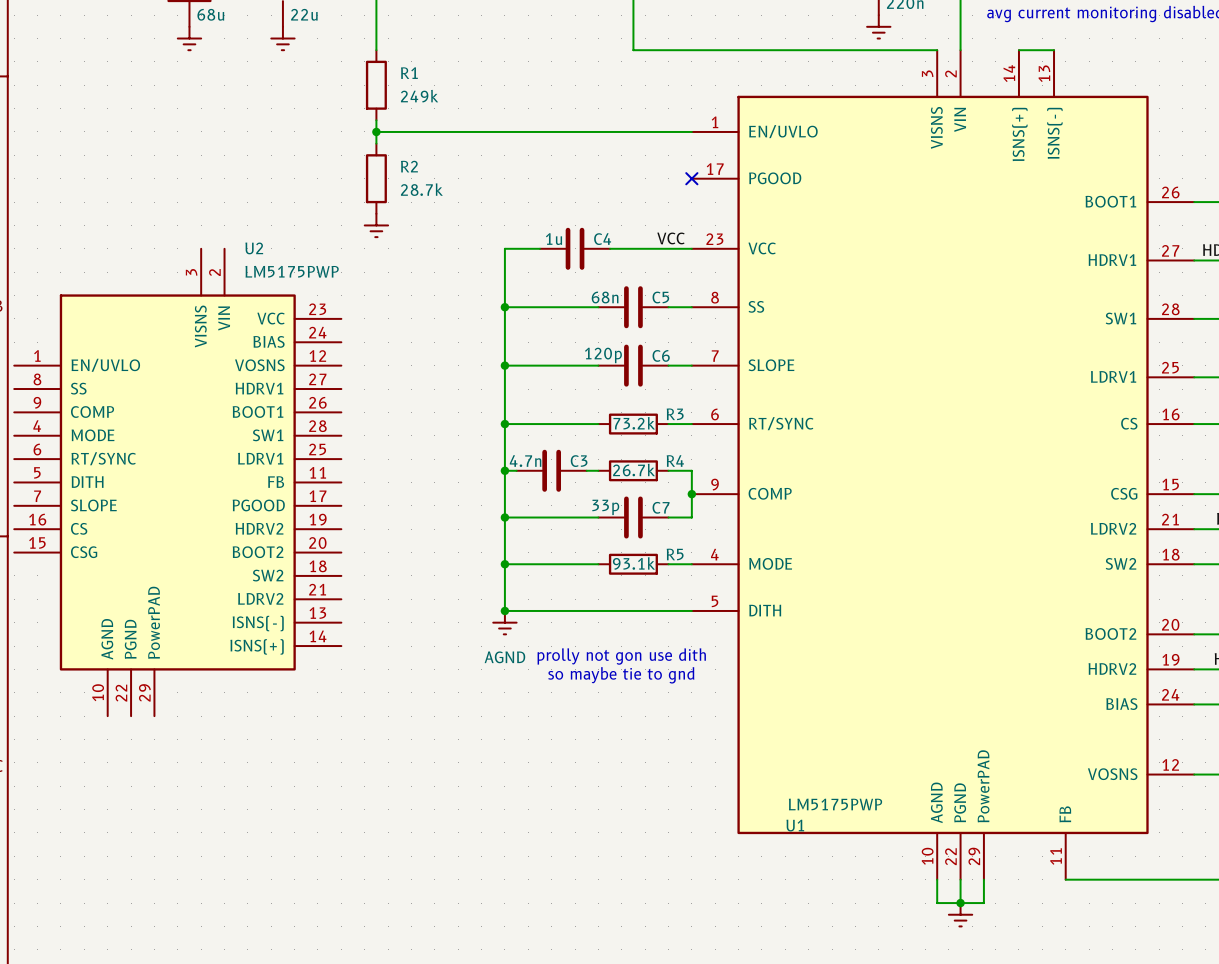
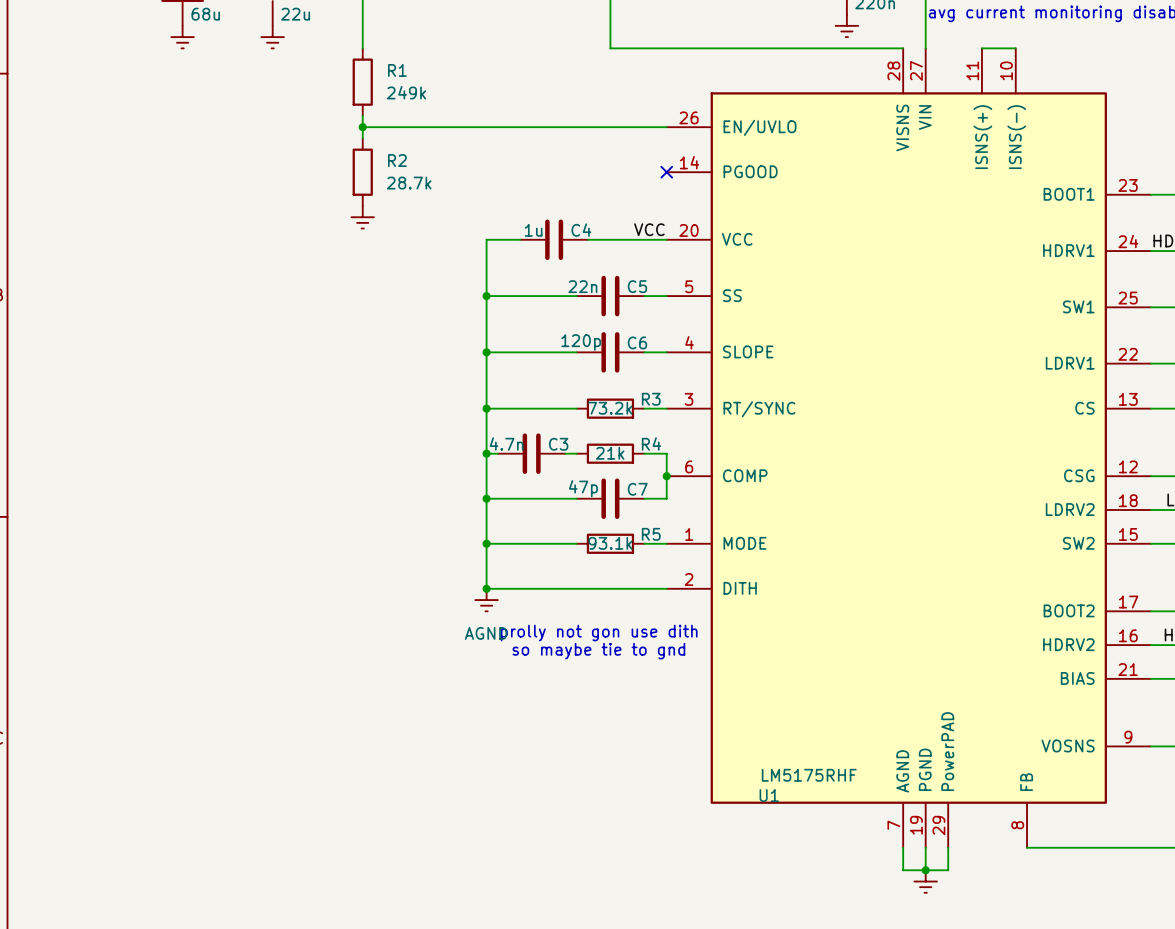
U1 symbol: [691, 50, 1195, 880] -> [666, 48, 1151, 848]
C5 value: 68n (605, 297) -> 22n (582, 286)
R4 value: 26.7k (634, 470) -> 21k (610, 453)
U2: LM5175PWP (177, 482) -> none
C7 value: 33p (605, 507) -> 47p (583, 488)
U1 value: LM5175PWP (835, 804) -> LM5175RHF (809, 775)

